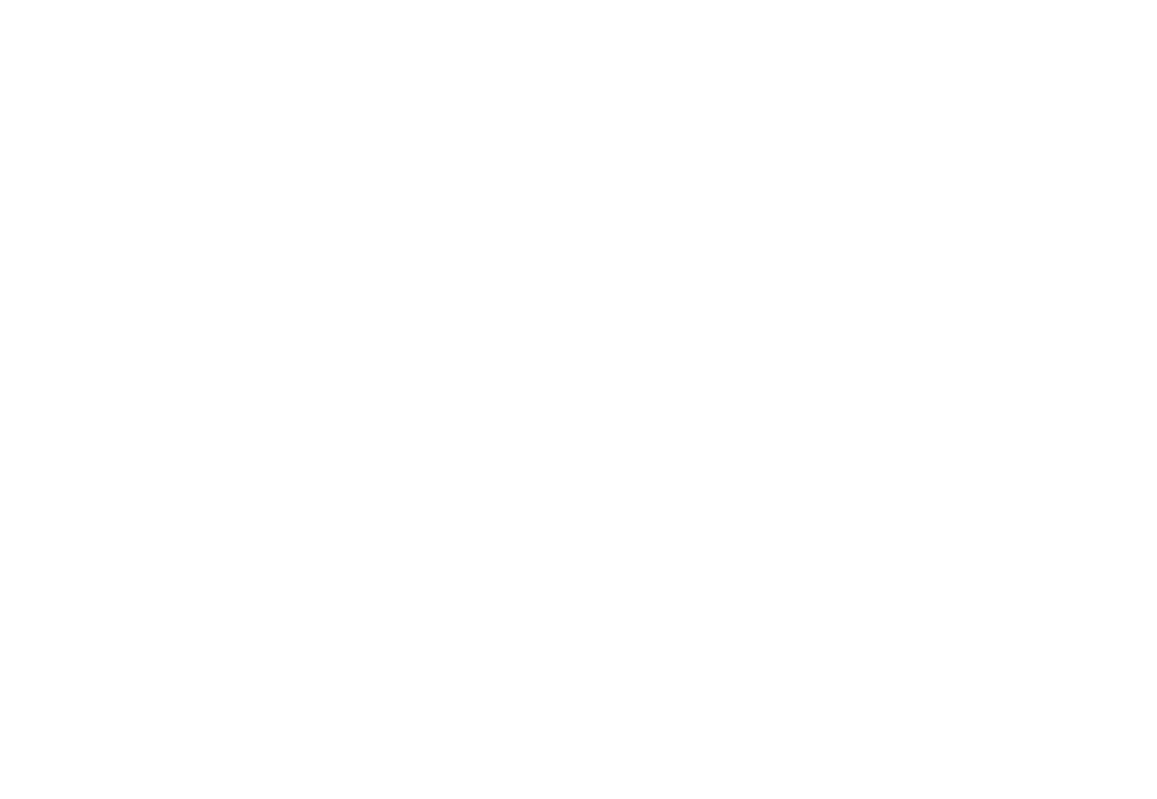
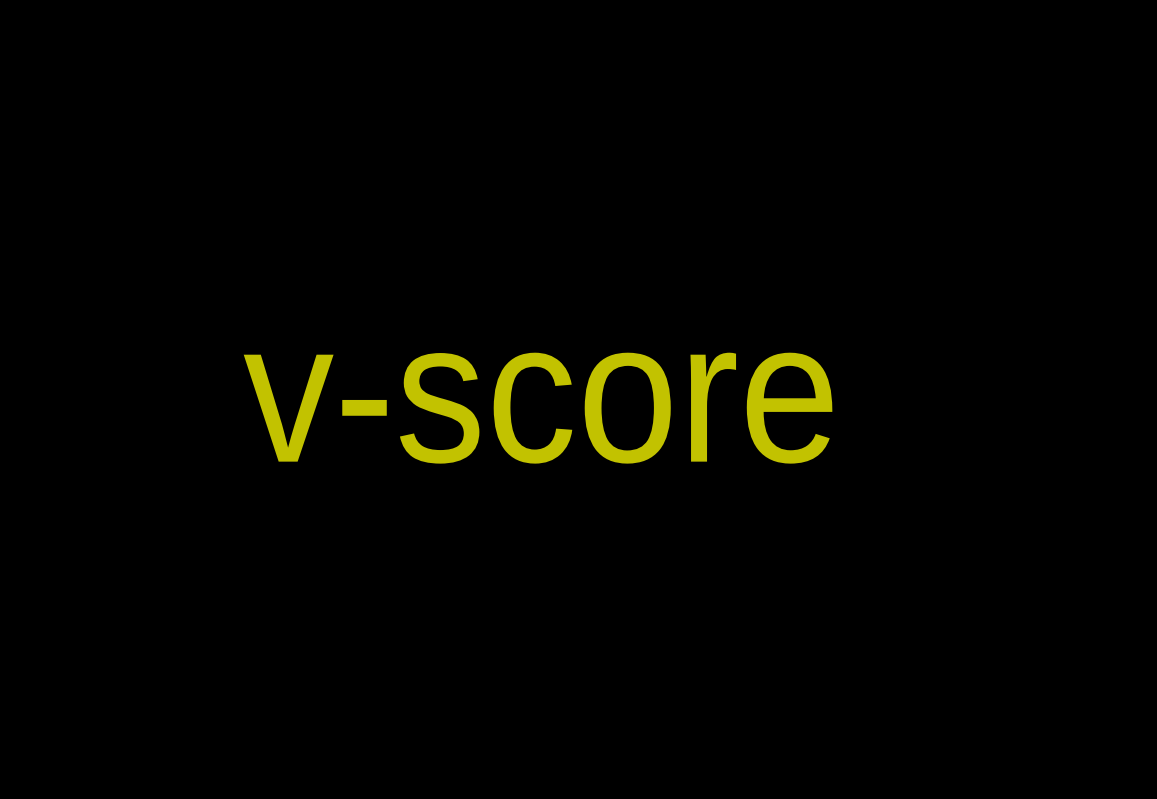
text: none -> v-score (538, 408)

